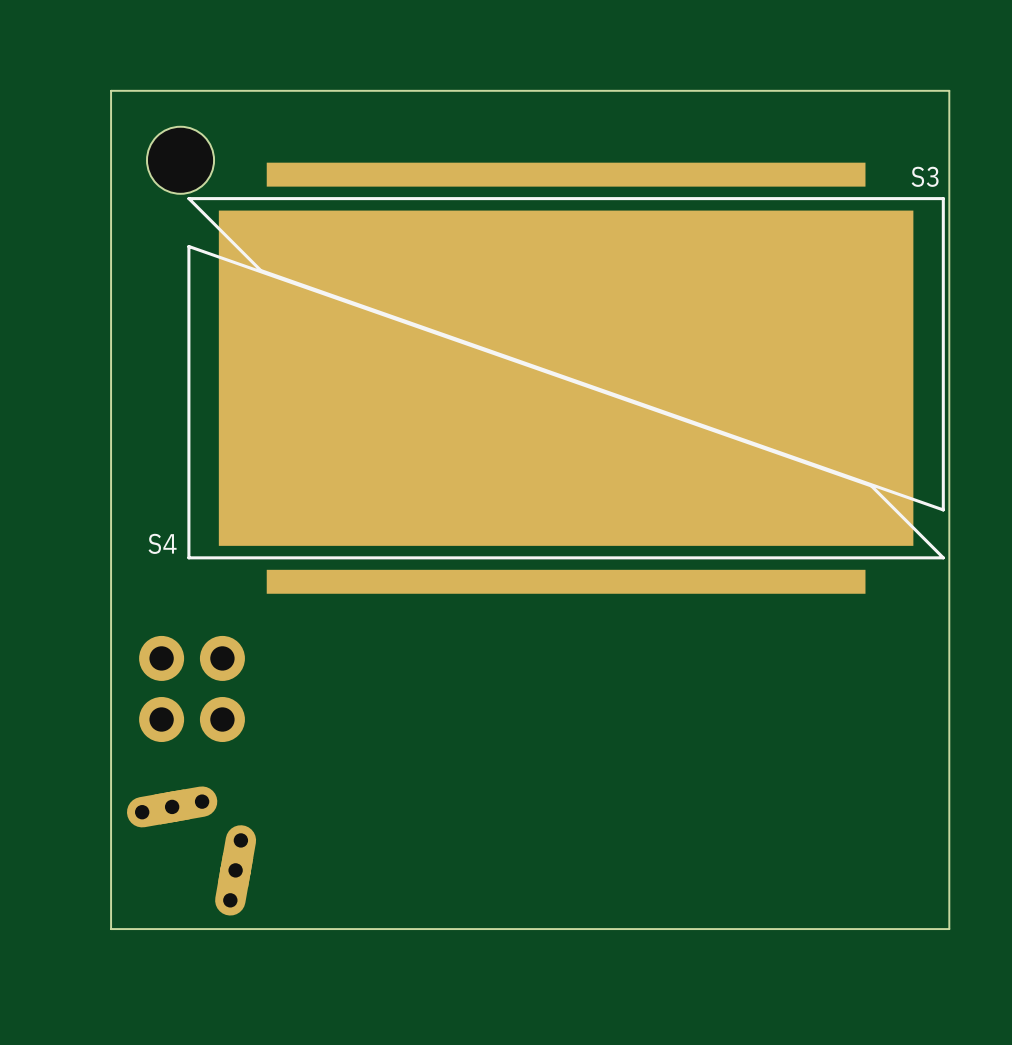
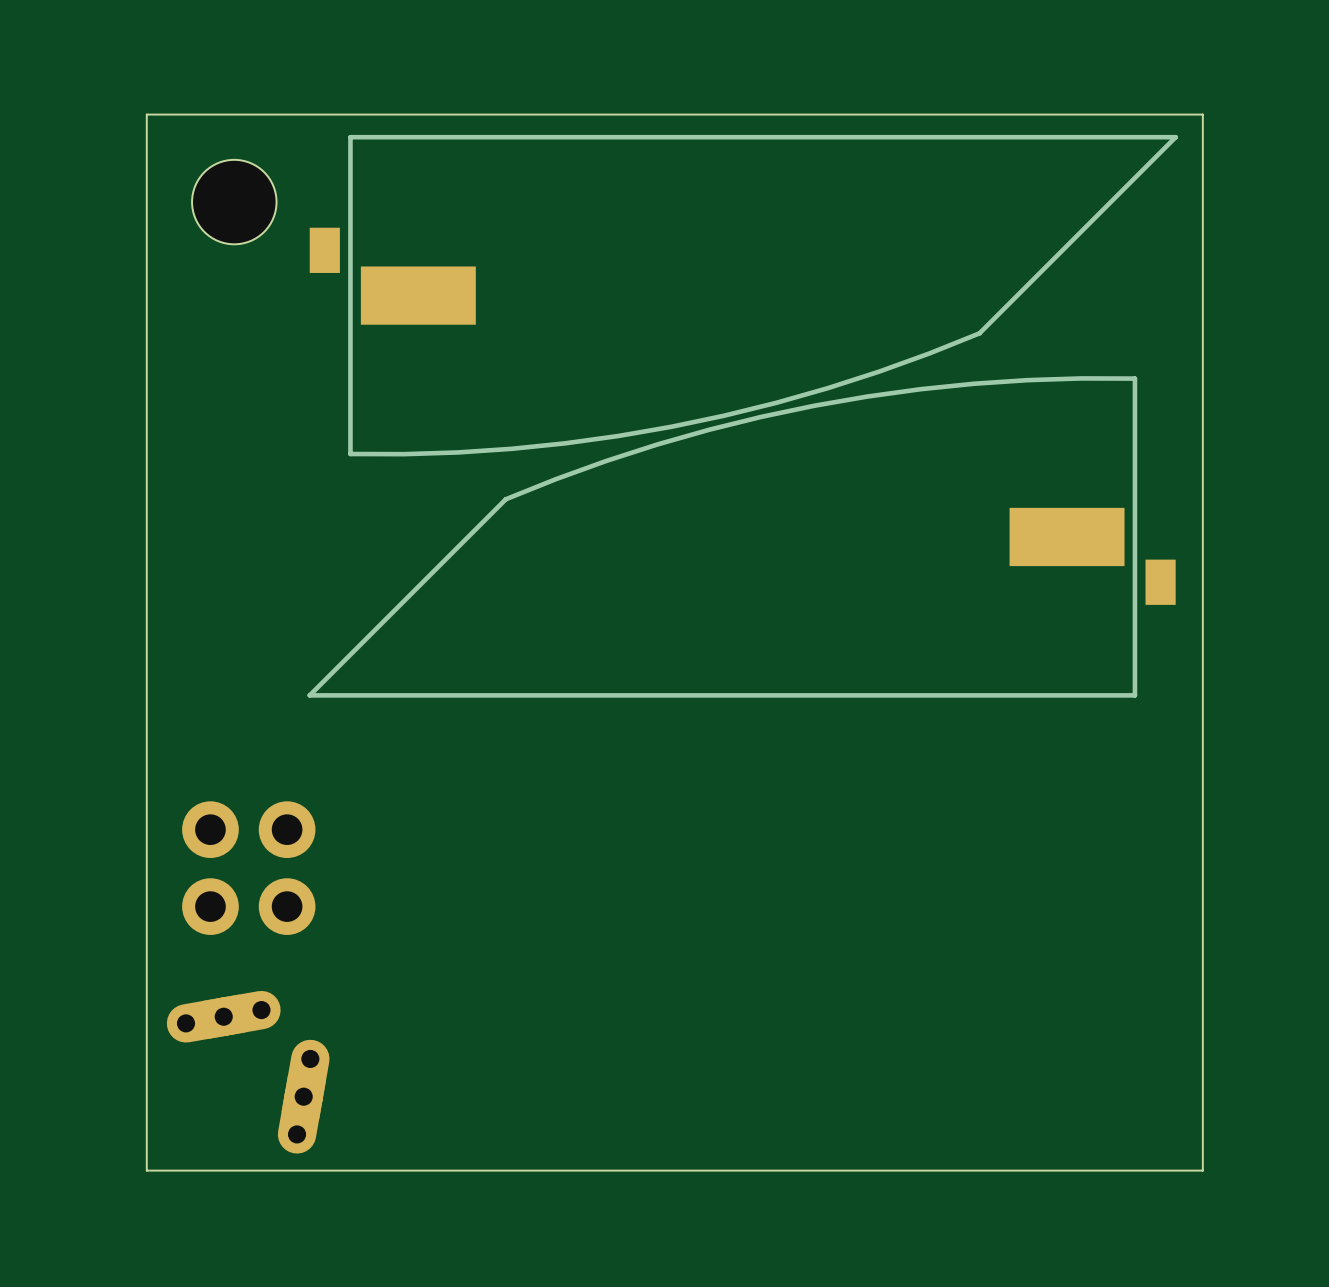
text: S3 (925, 176) -> none
part: none -> (743, 295)
part: (566, 378) -> none
part: none -> (741, 536)
text: S4 (162, 543) -> none

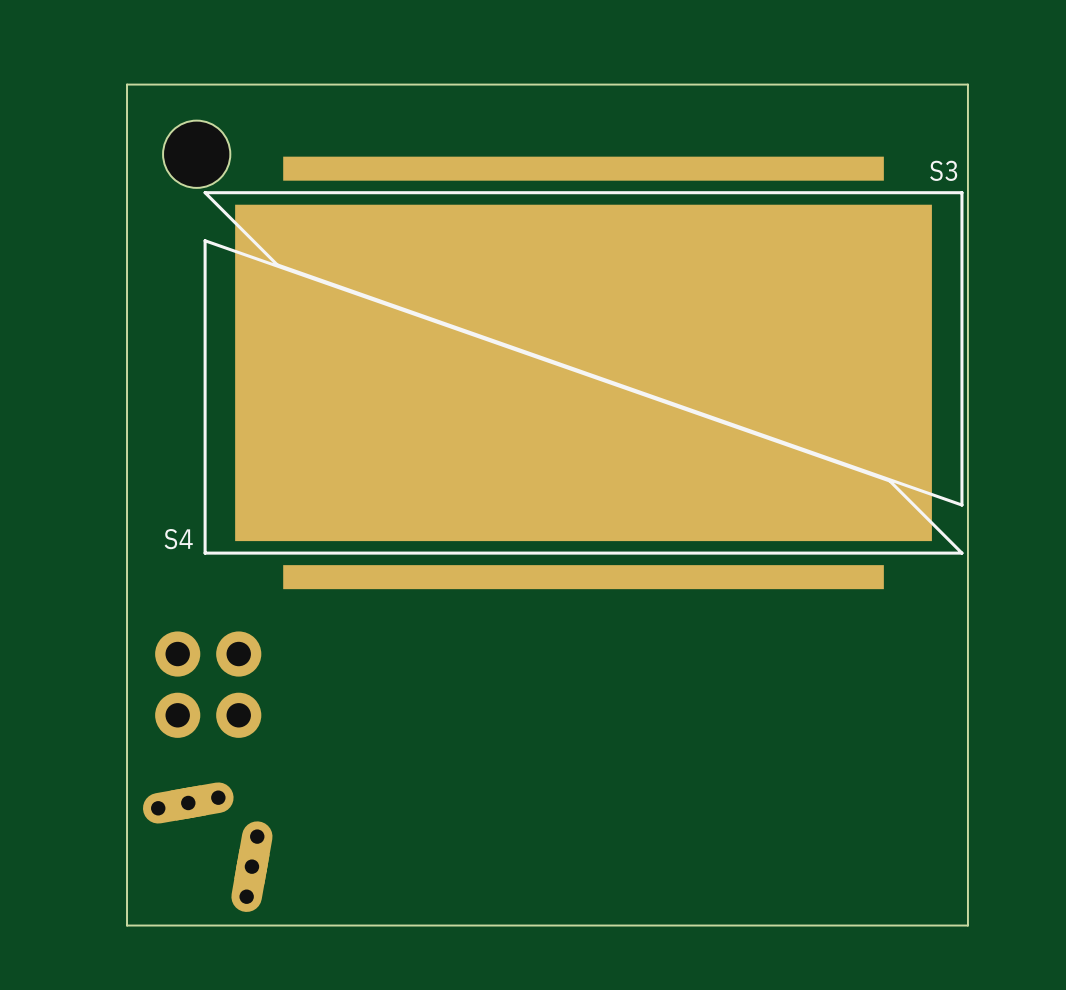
text: none -> S3 (943, 170)
part: (743, 295) -> none
part: none -> (583, 372)
part: (741, 536) -> none
text: none -> S4 (178, 539)

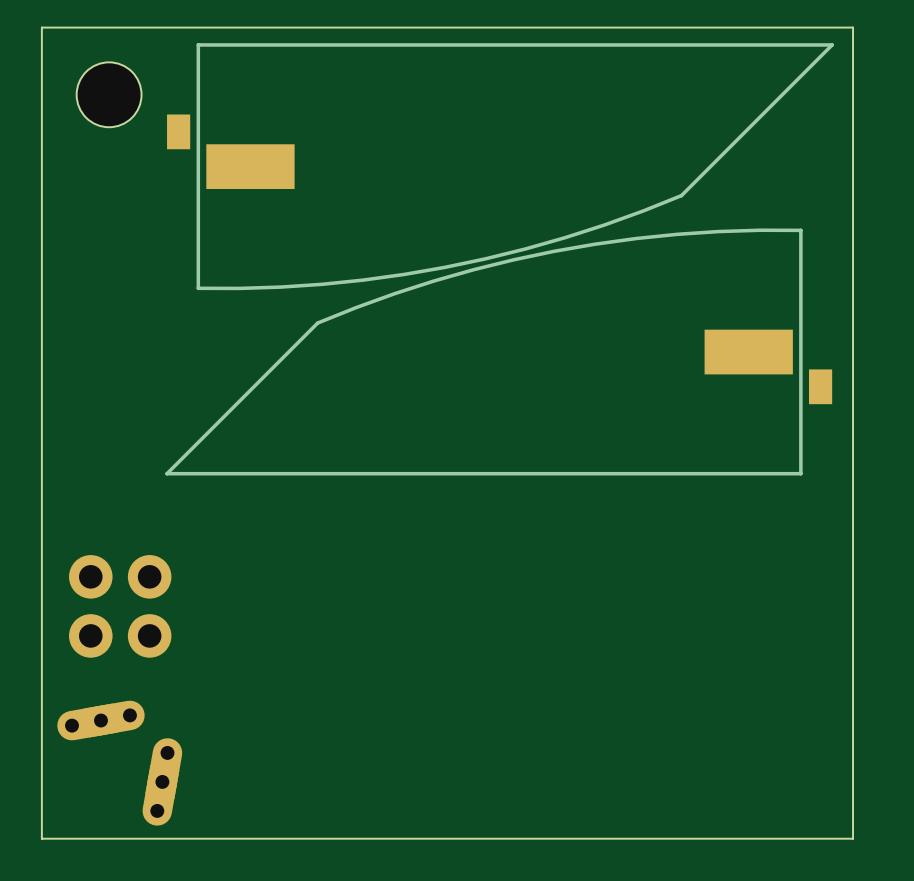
text: S3 (943, 170) -> none
part: none -> (500, 166)
part: (583, 372) -> none
part: none -> (498, 351)
text: S4 (178, 539) -> none

